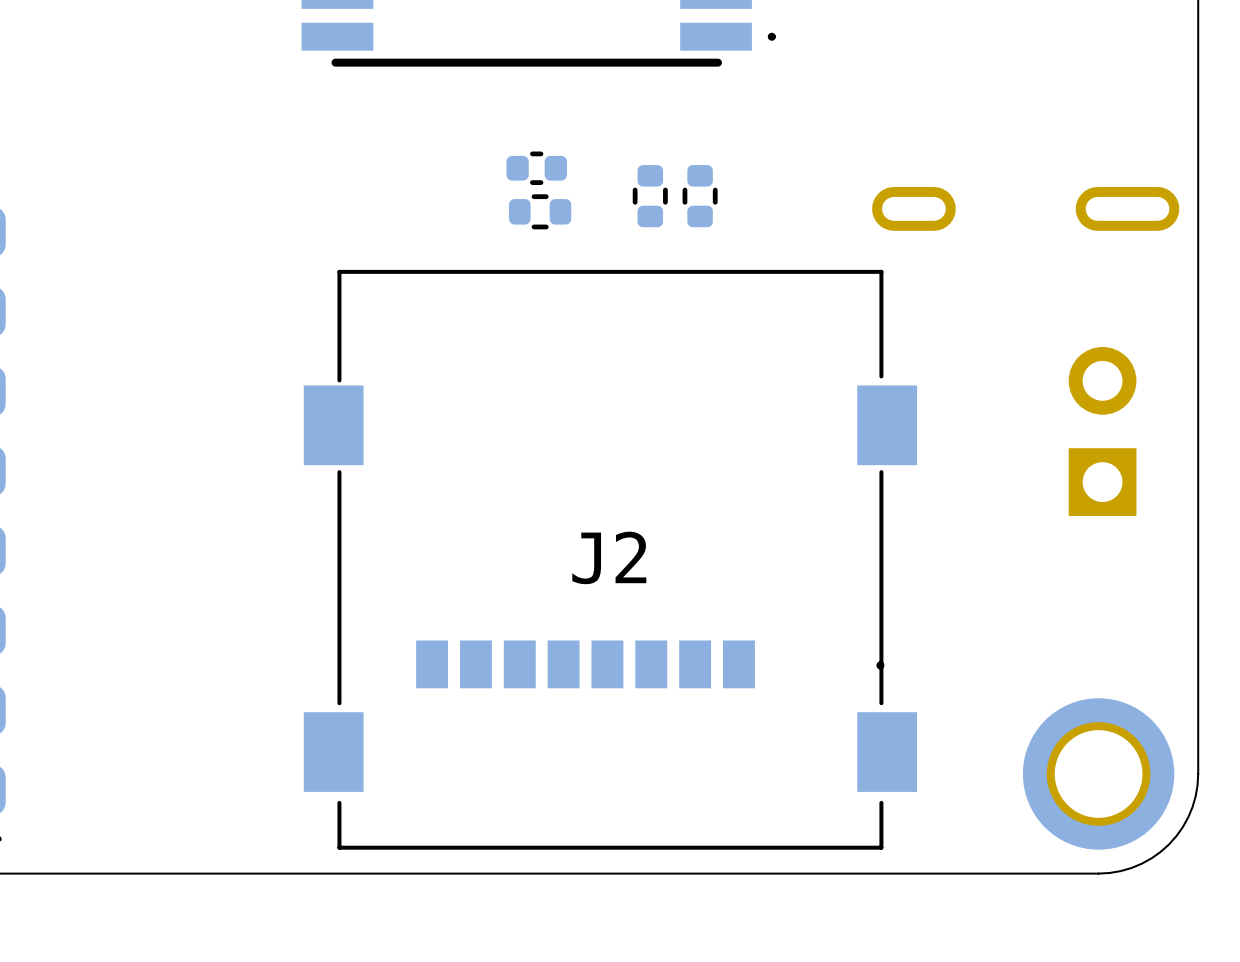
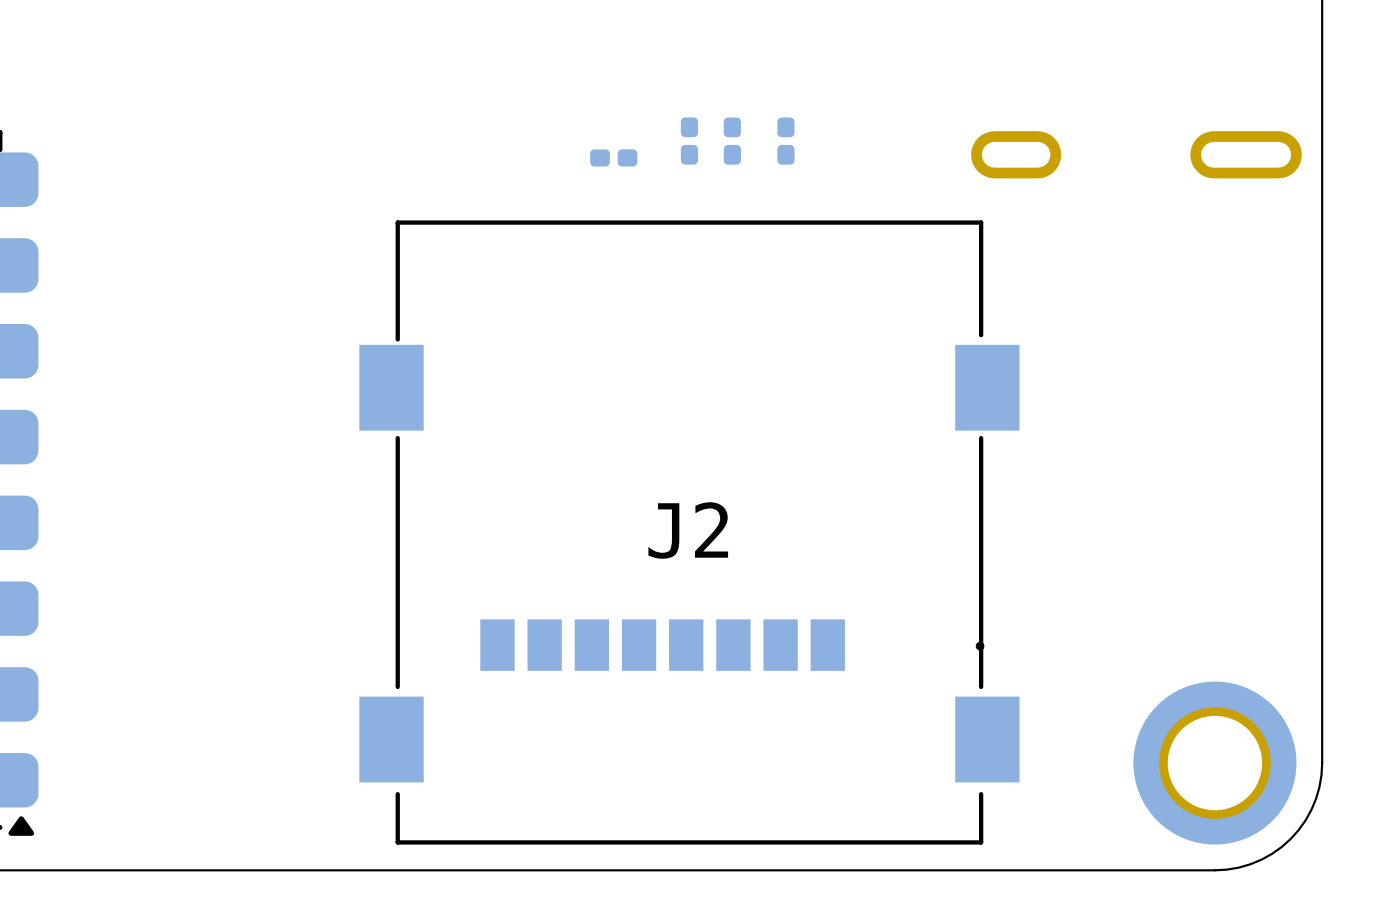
part footprint: [632, 165, 668, 228] -> [723, 117, 741, 165]
part footprint: [682, 165, 718, 228] -> [777, 117, 795, 165]
part: (536, 168) -> none
part footprint: [509, 194, 572, 230] -> [590, 149, 638, 167]
part: none -> (689, 141)
part: (1102, 431) -> none

